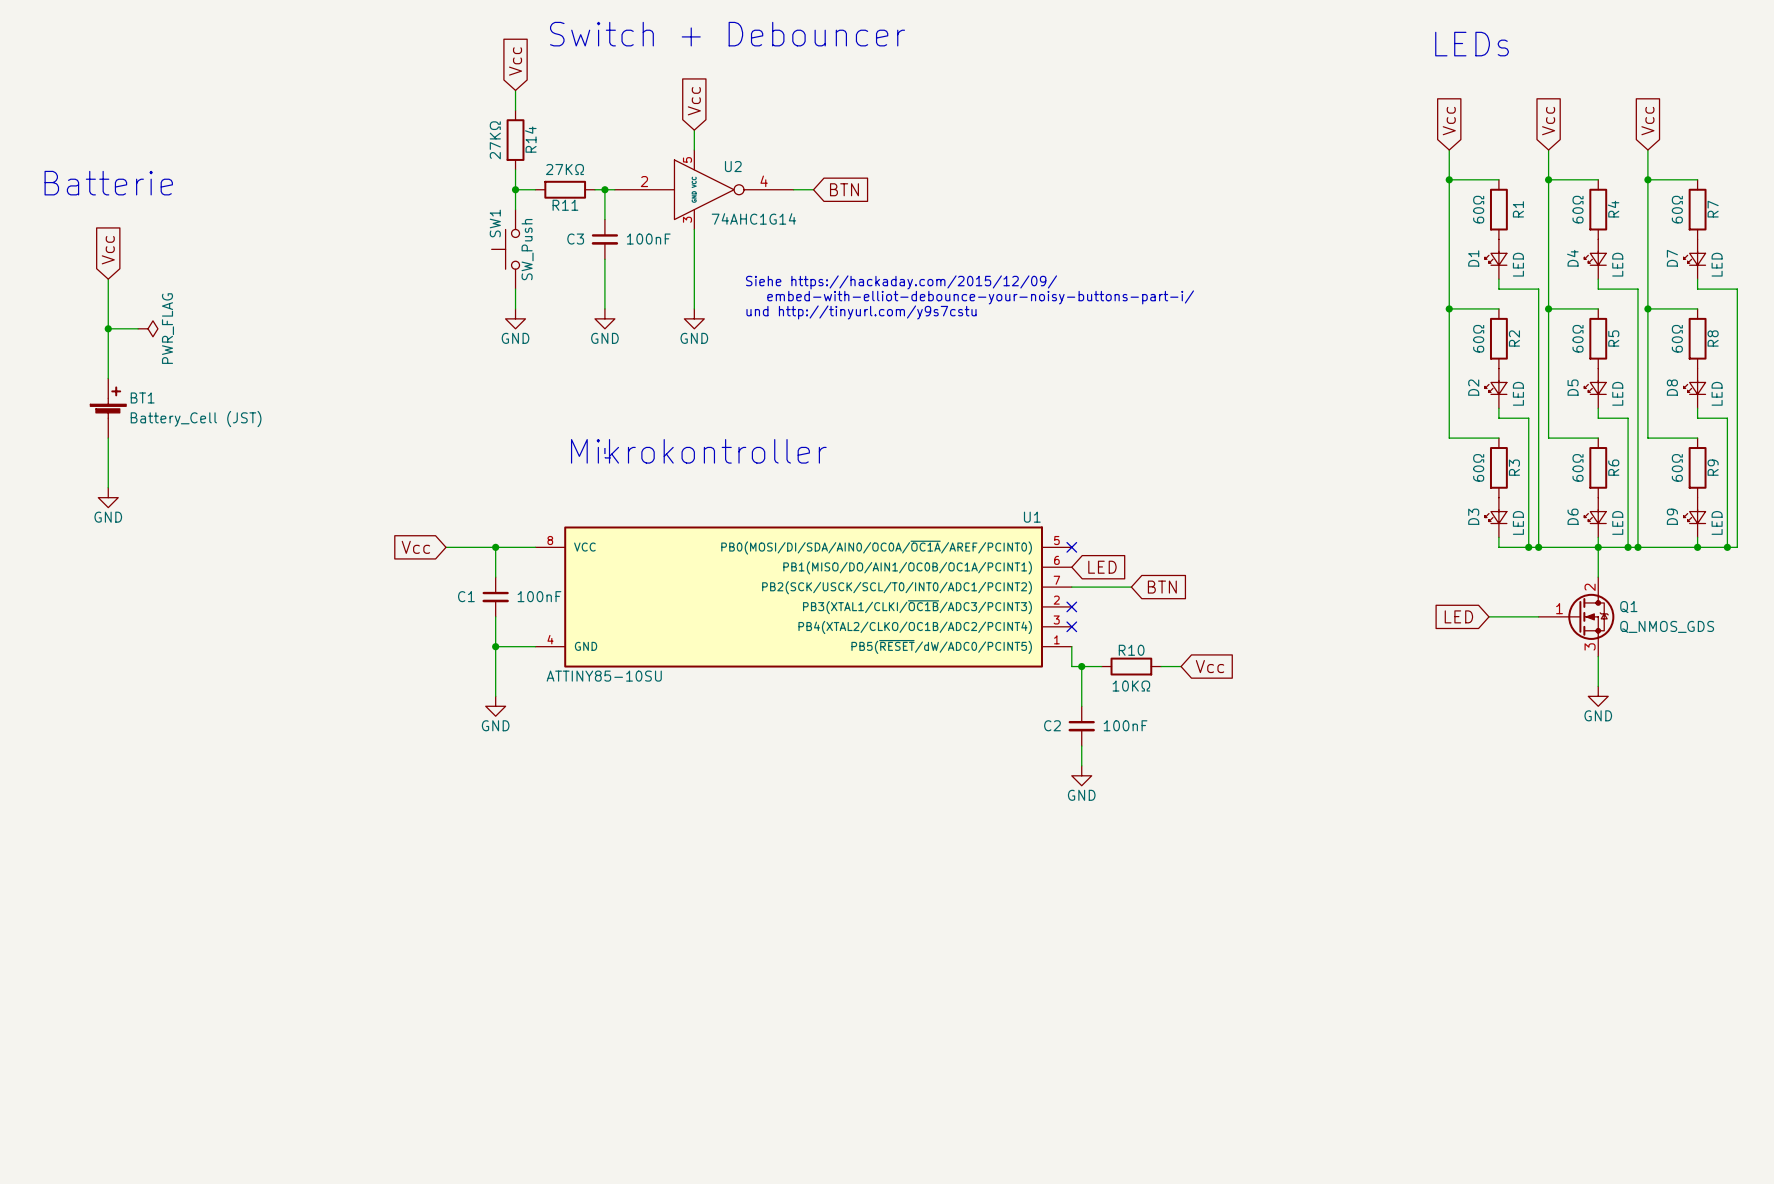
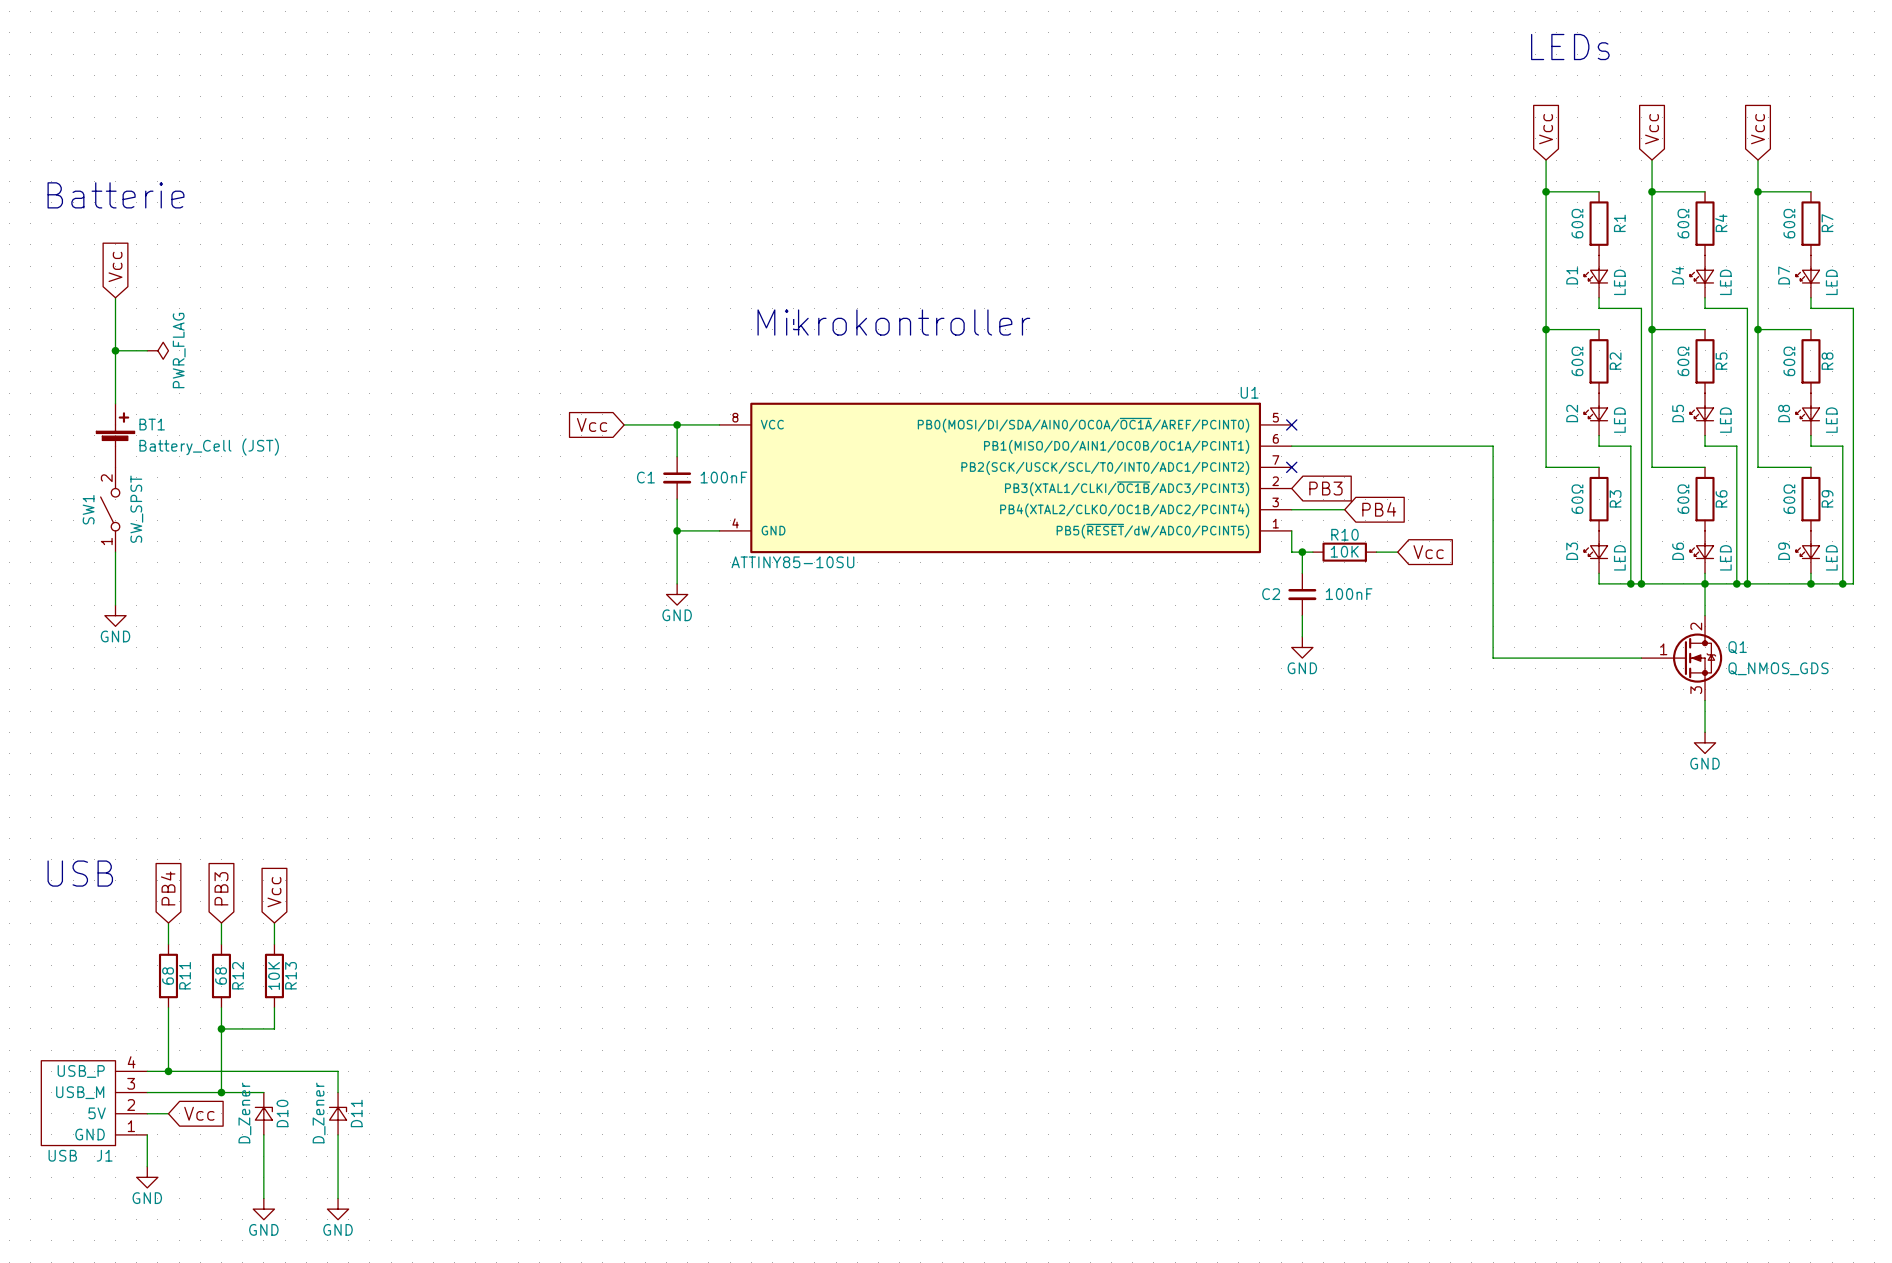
text: Switch + Debouncer (727, 34) -> none
global label: Vcc (515, 61) -> none
wire: (515, 90) (515, 110) -> none
global label: Vcc (694, 101) -> none
wire: (694, 130) (694, 150) -> none
R14: 27KΩ (515, 140) -> none
wire: (515, 169) (515, 209) -> none
R11 value: 27KΩ (564, 169) -> 68 (168, 975)
wire: (515, 189) (535, 189) -> none
junction: (515, 189) -> none
R11 rotation: 0° (565, 189) -> 90° clockwise (168, 975)
R11 position: (565, 189) -> (168, 975)
wire: (595, 189) (614, 189) -> none
wire: (604, 189) (604, 219) -> none
junction: (604, 189) -> none
U2: 74AHC1G14 (704, 189) -> none
wire: (793, 189) (813, 189) -> none
global label: BTN (844, 189) -> none
R11 name position: R11 (565, 205) -> R11 (185, 975)
SW1 symbol: [491, 209, 520, 290] -> [100, 467, 120, 553]
SW1 name position: SW1 (495, 223) -> SW1 (88, 509)
wire: (694, 229) (694, 308) -> none
C3: 100nF (604, 239) -> none
SW1 value: SW_Push (527, 249) -> SW_SPST (136, 509)
wire: (604, 259) (604, 308) -> none
text: Siehe https://hackaday.com/2015/12/09/ (901, 282) -> none
wire: (515, 289) (515, 308) -> none
text: embed-with-elliot-debounce-your-noisy-buttons-part-i/ (980, 297) -> none
line: none -> (793, 318) (793, 329) (804, 329)
text: none -> Mikrokontroller (893, 322)
text: und http://tinyurl.com/y9s7cstu (861, 312) -> none
power symbol: GND (515, 318) -> none
power symbol: GND (604, 318) -> none
power symbol: GND (694, 318) -> none
global label: none -> Vcc (592, 424)
wire: none -> (624, 424) (719, 424)
wire: none -> (677, 424) (677, 456)
junction: none -> (677, 424)
no-connect mark: none -> (1291, 424)
wire: none -> (1291, 446) (1493, 446) (1493, 658) (1588, 658)
wire: (108, 438) (108, 487) -> (115, 552) (115, 605)
no-connect mark: none -> (1291, 467)
line: (604, 448) (604, 457) (614, 457) -> none
text: Mikrokontroller (698, 451) -> none
global label: none -> PB3 (1325, 488)
wire: none -> (677, 499) (677, 583)
wire: none -> (1291, 509) (1344, 509)
global label: none -> PB4 (1379, 509)
power symbol position: GND (108, 497) -> GND (115, 615)
wire: none -> (677, 530) (719, 530)
junction: none -> (677, 530)
wire: none -> (1291, 530) (1291, 552) (1312, 552)
wire: none -> (1302, 552) (1302, 573)
junction: none -> (1302, 552)
wire: none -> (1376, 552) (1397, 552)
global label: none -> Vcc (1428, 552)
global label: Vcc (415, 547) -> none
wire: (446, 547) (535, 547) -> none
wire: (495, 547) (495, 577) -> none
junction: (495, 547) -> none
no-connect mark: (1071, 547) -> none
power symbol: none -> GND (677, 594)
global label: LED (1102, 567) -> none
wire: none -> (1302, 615) (1302, 636)
wire: (1071, 587) (1131, 587) -> none
global label: BTN (1162, 587) -> none
C1 position: (495, 597) -> (677, 477)
U1 position: (803, 597) -> (1005, 477)
no-connect mark: (1071, 606) -> none
power symbol: none -> GND (1302, 647)
wire: (495, 616) (495, 696) -> none
global label: LED (1458, 616) -> none
no-connect mark: (1071, 626) -> none
wire: (495, 646) (535, 646) -> none
junction: (495, 646) -> none
wire: (1071, 646) (1071, 666) (1101, 666) -> none
wire: (1081, 666) (1081, 706) -> none
junction: (1081, 666) -> none
R10 position: (1131, 666) -> (1344, 552)
wire: (1161, 666) (1181, 666) -> none
global label: Vcc (1210, 666) -> none
R10 value: 10KΩ (1131, 686) -> 10K (1344, 551)
power symbol: GND (495, 706) -> none
C2 position: (1081, 726) -> (1302, 594)
wire: (1081, 746) (1081, 765) -> none
power symbol: GND (1081, 775) -> none
text: none -> USB (80, 873)
global label: none -> PB4 (168, 888)
global label: none -> PB3 (221, 888)
global label: none -> Vcc (274, 892)
wire: none -> (168, 923) (168, 944)
wire: none -> (221, 923) (221, 944)
wire: none -> (274, 923) (274, 944)
R12: none -> 68 (221, 975)
R13: none -> 10K (274, 975)
wire: none -> (168, 1007) (168, 1071)
wire: none -> (221, 1007) (221, 1092)
wire: none -> (274, 1007) (274, 1028) (221, 1028)
junction: none -> (221, 1028)
wire: none -> (147, 1071) (338, 1071) (338, 1092)
junction: none -> (168, 1071)
wire: none -> (147, 1092) (263, 1092)
junction: none -> (221, 1092)
J1: none -> USB (94, 1103)
wire: none -> (147, 1113) (168, 1113)
global label: none -> Vcc (199, 1113)
D10: none -> D_Zener (263, 1113)
D11: none -> D_Zener (338, 1113)
wire: none -> (147, 1134) (147, 1166)
wire: none -> (263, 1134) (263, 1198)
wire: none -> (338, 1134) (338, 1198)
power symbol: none -> GND (147, 1177)
power symbol: none -> GND (263, 1209)
power symbol: none -> GND (338, 1209)

